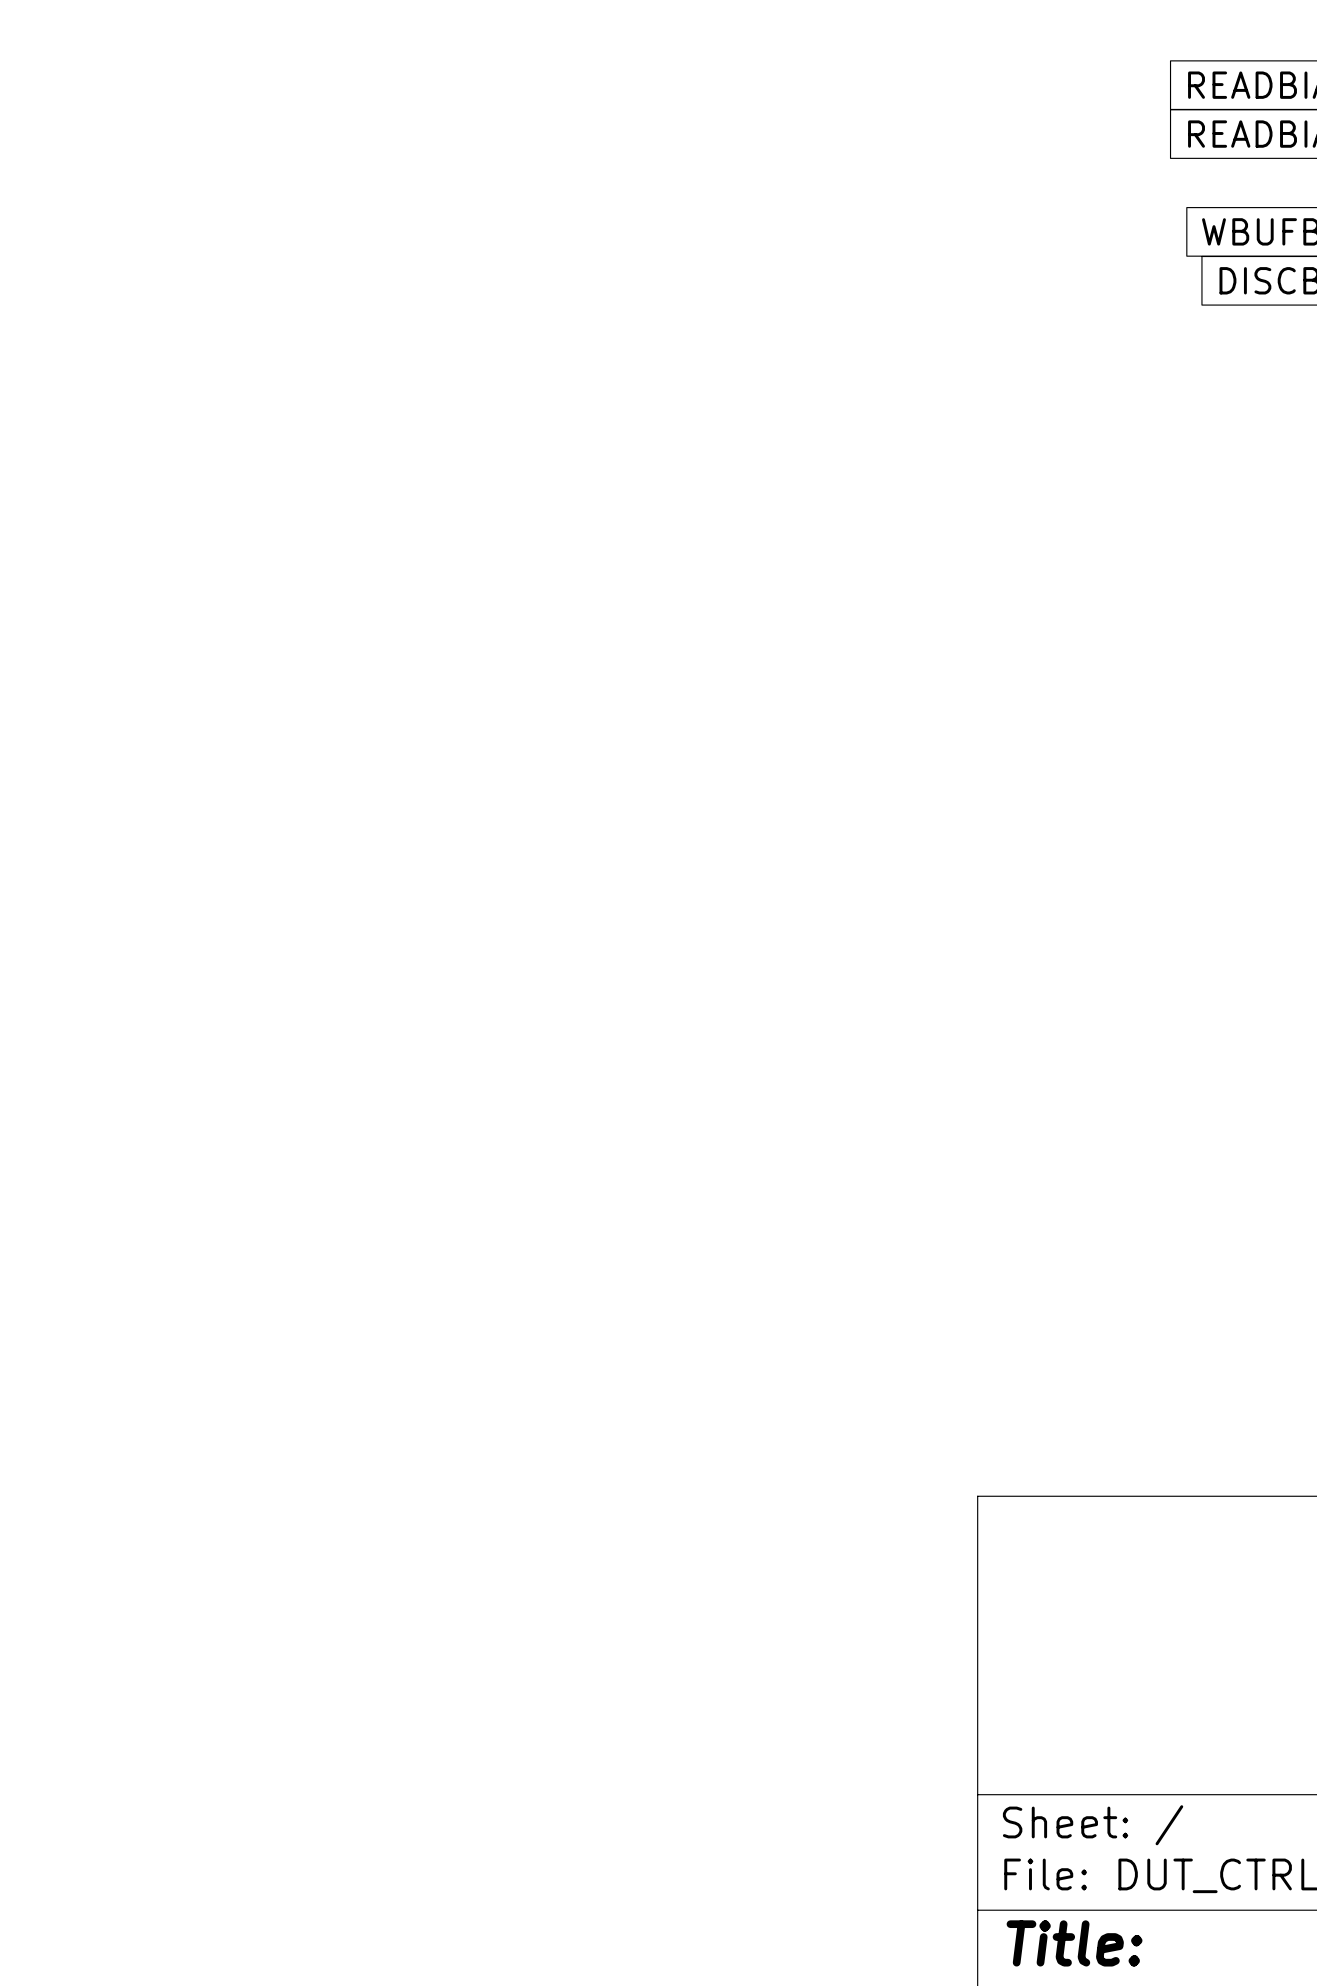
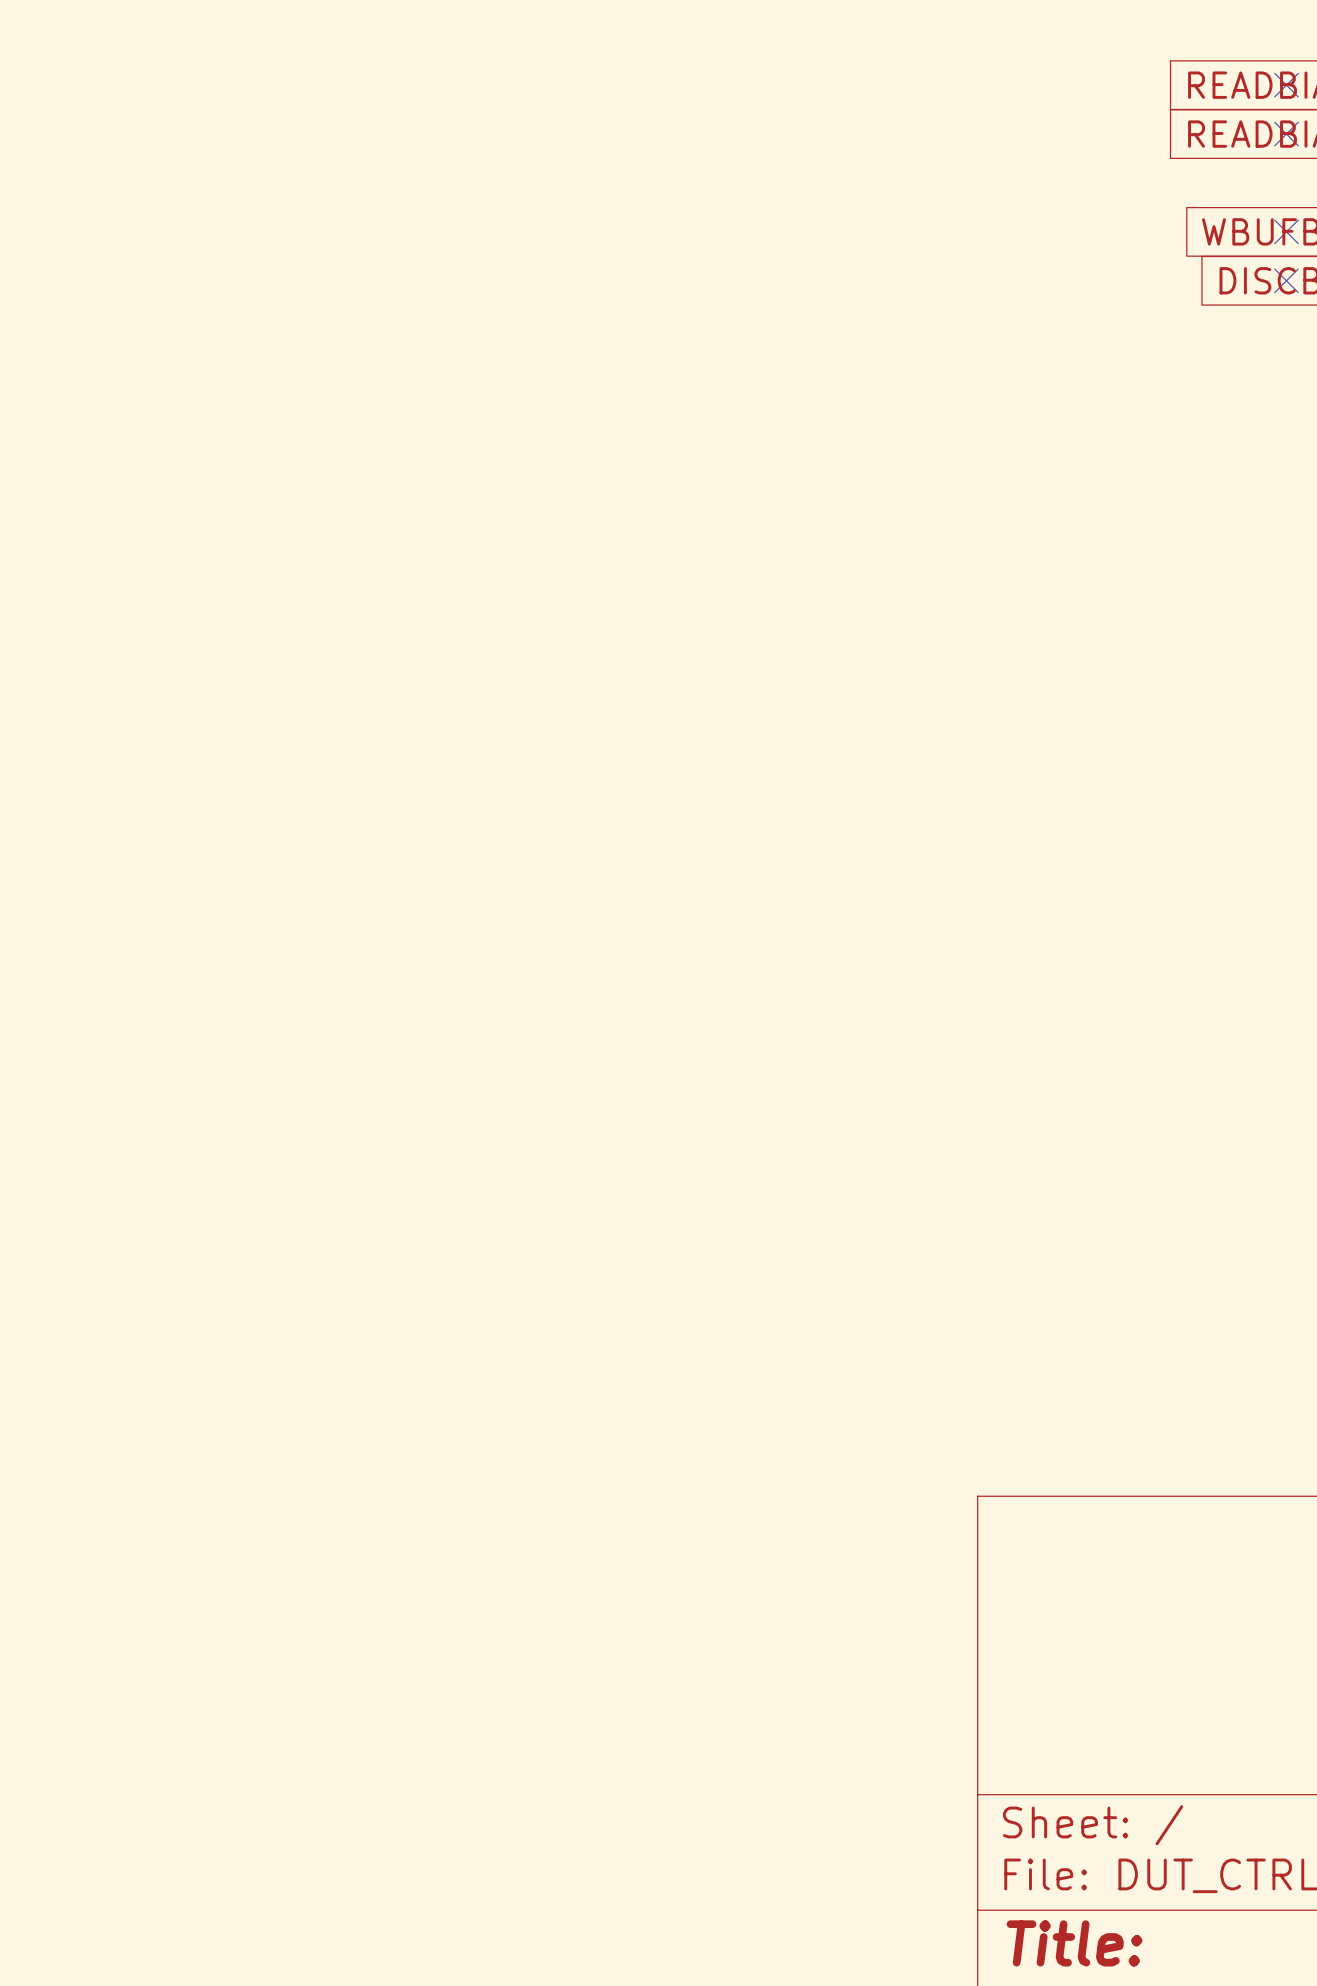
no-connect mark: none -> (1286, 85)
no-connect mark: none -> (1286, 134)
no-connect mark: none -> (1286, 231)
no-connect mark: none -> (1286, 280)

